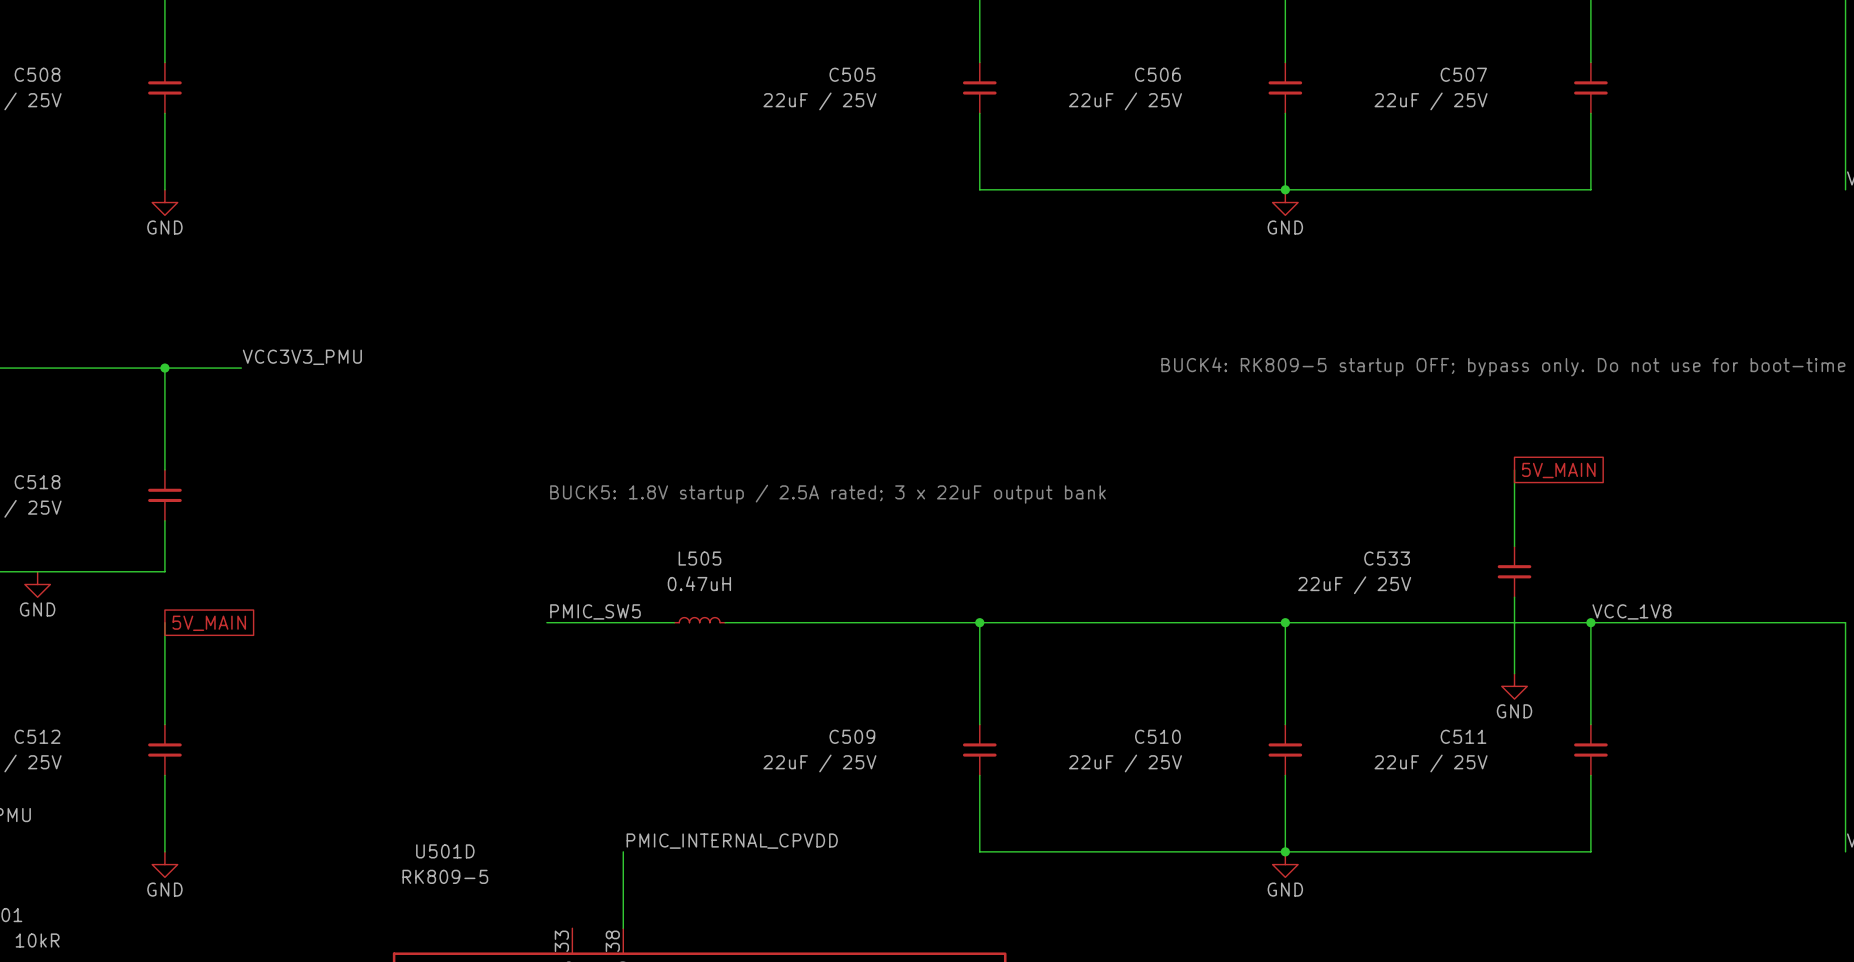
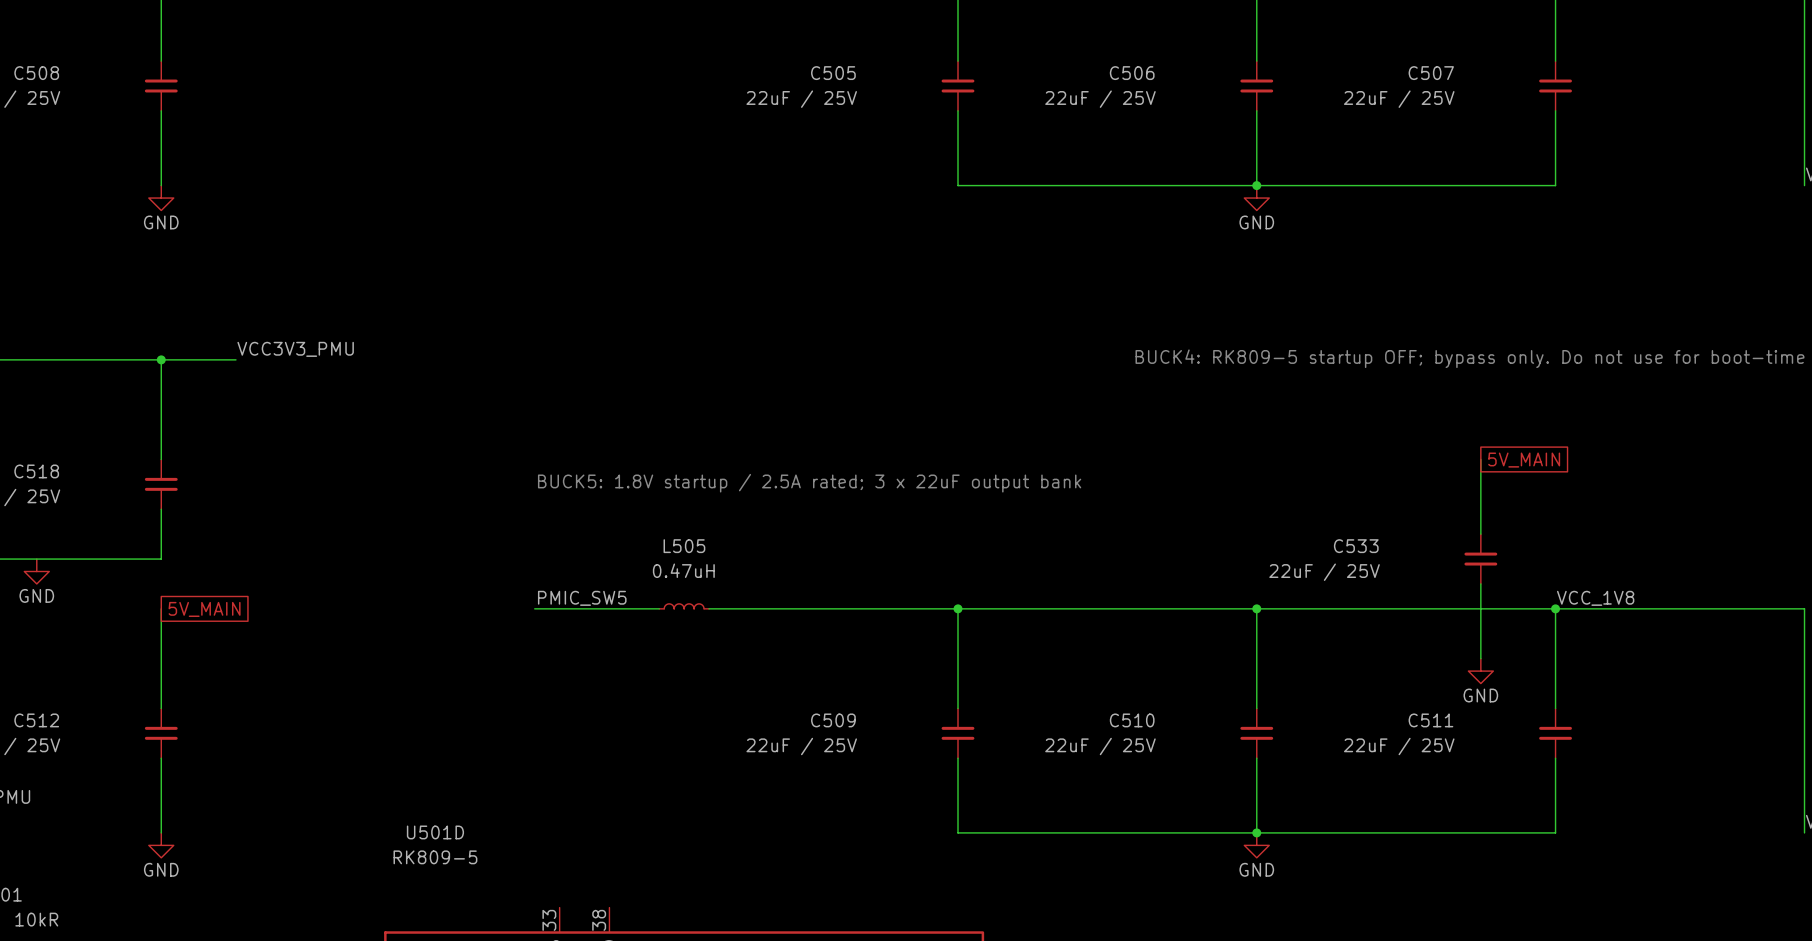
label: PMIC_INTERNAL_CPVDD (732, 841) -> none
wire: (623, 851) (623, 928) -> none

